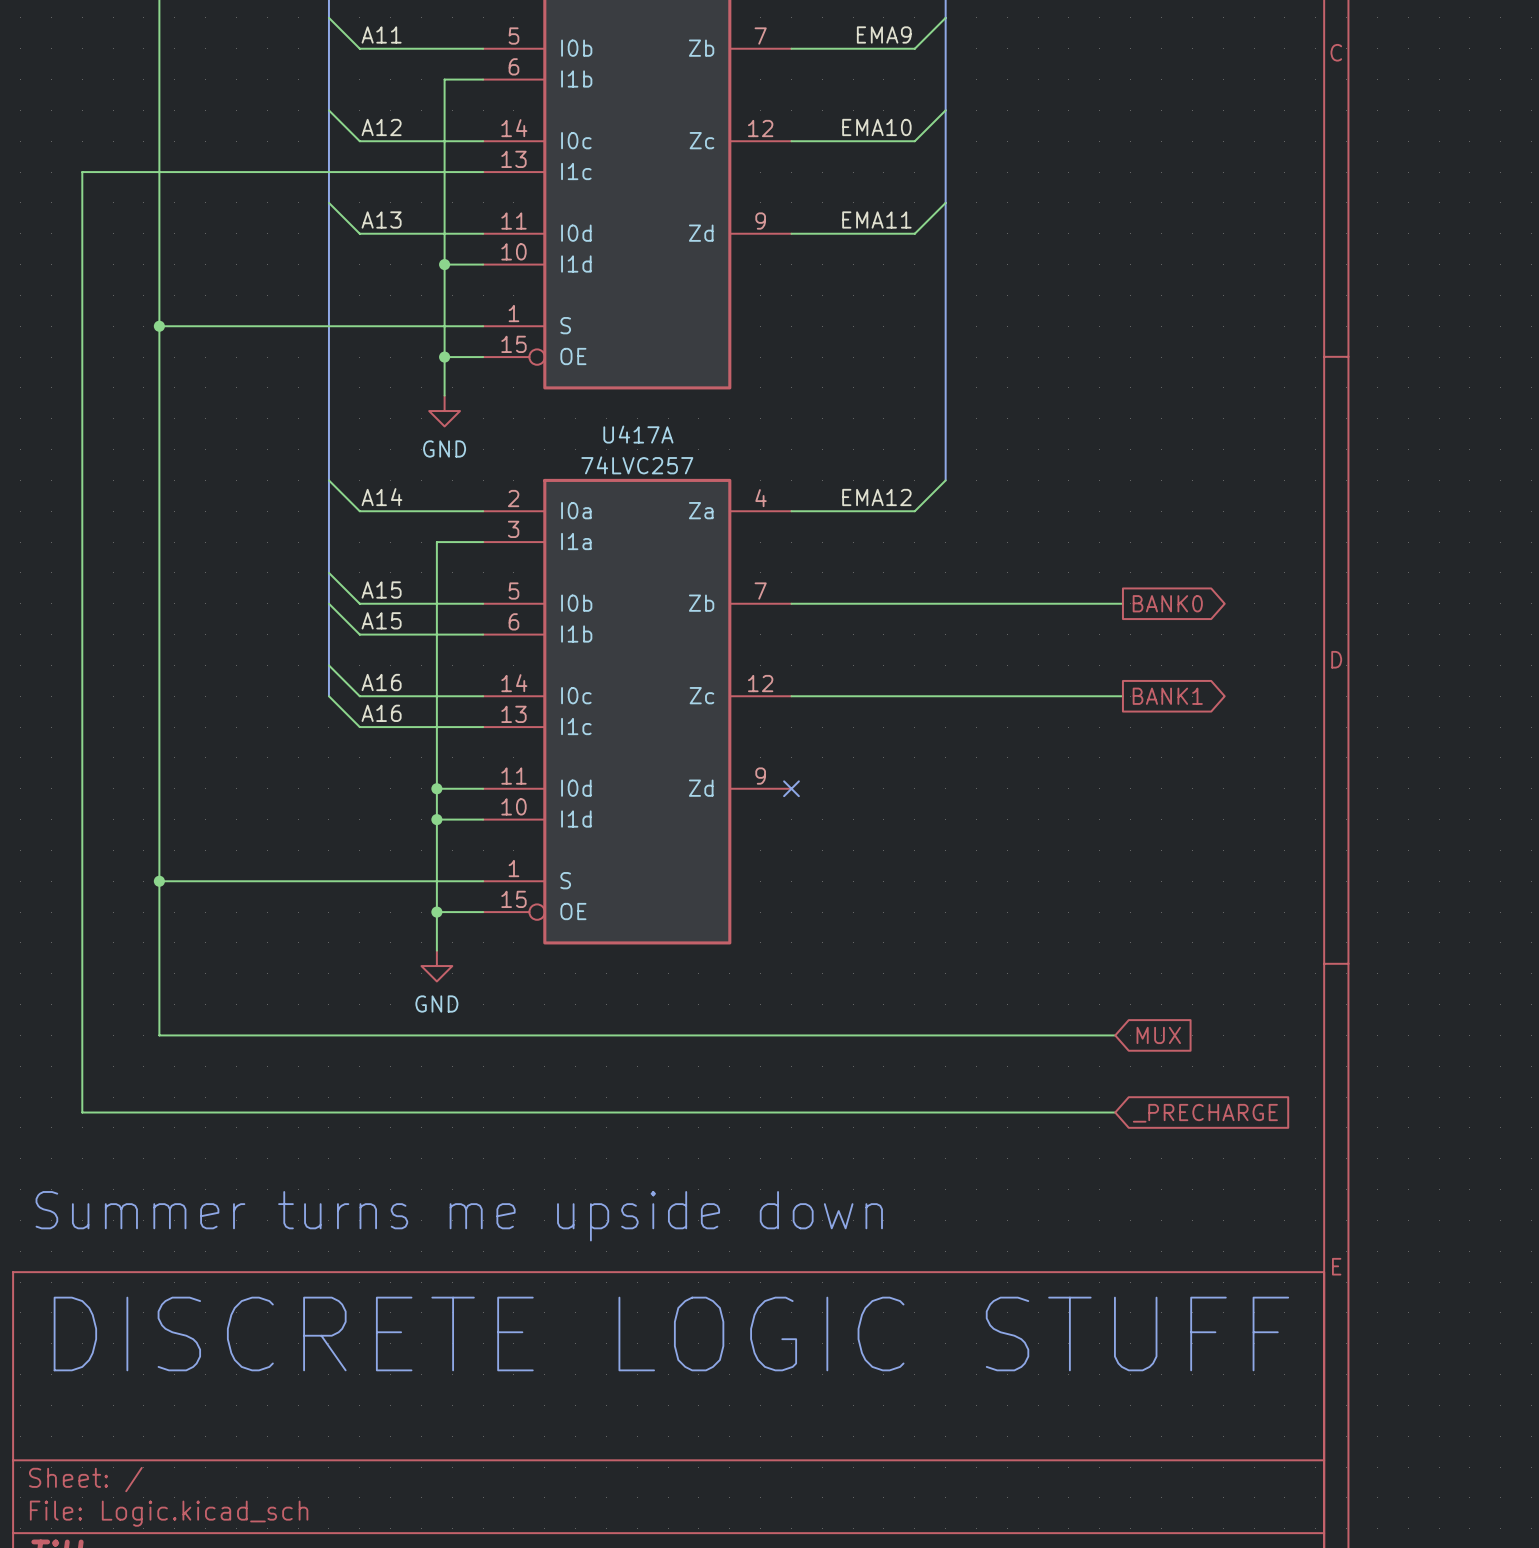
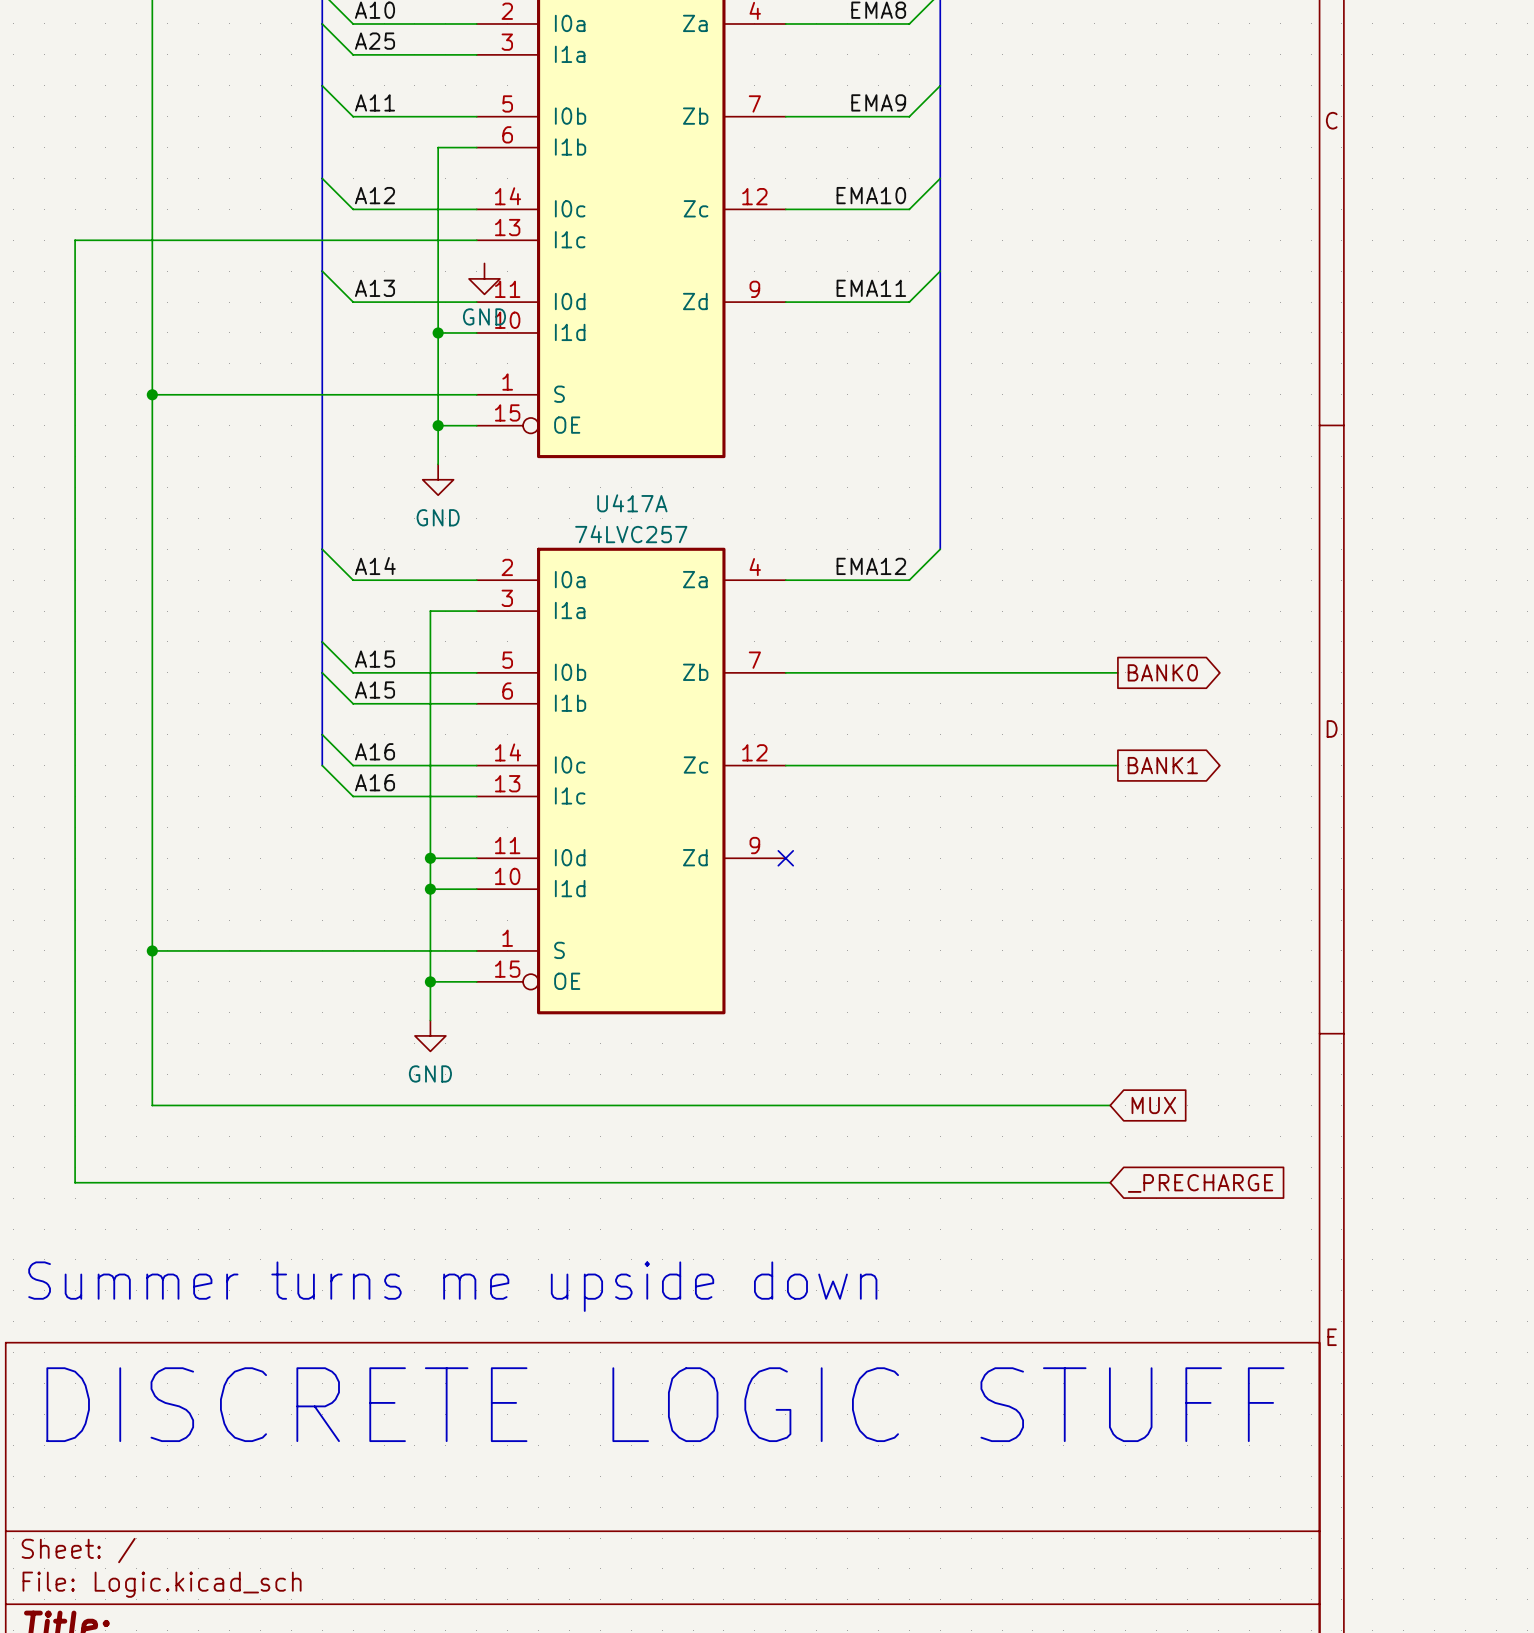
power symbol: none -> GND (484, 278)

